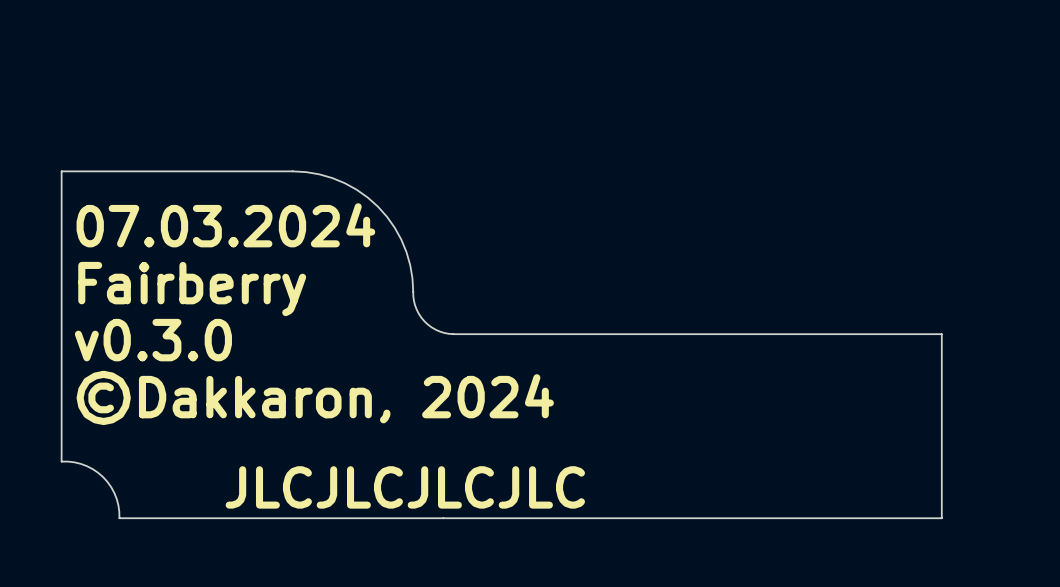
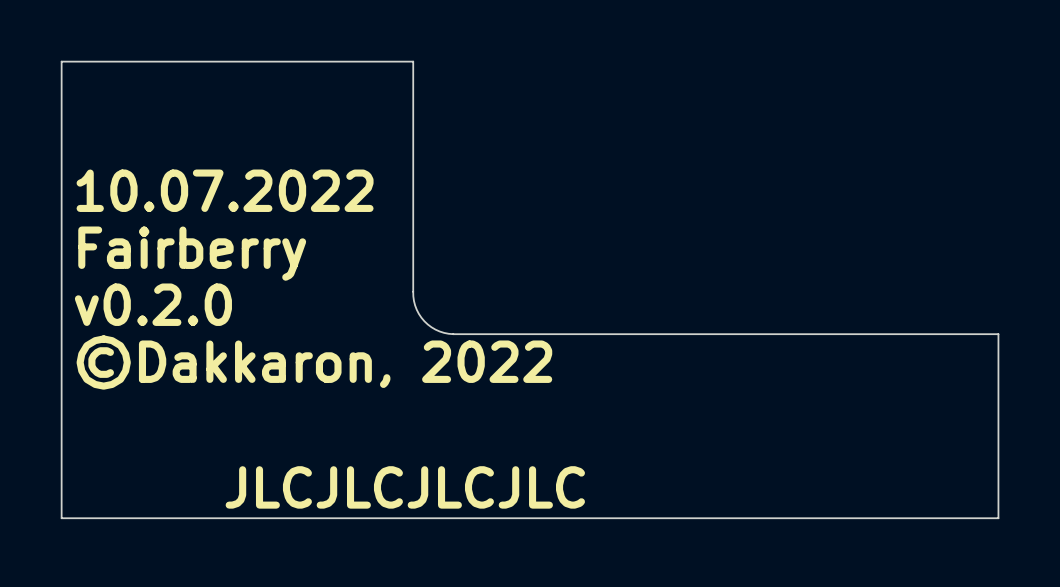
board edge: (61, 171) (292, 171) (319, 174) (332, 178) (356, 189) (367, 197) (377, 206) (394, 227) (406, 251) (412, 278) (413, 291) -> (61, 171) (61, 61) (413, 61) (413, 291)
text: none -> 10.07.2022 (225, 190)
text: 07.03.2024 (225, 225) -> none
text position: Fairberry (192, 289) -> Fairberry (192, 253)
board edge: (941, 334) (941, 518) -> (941, 334) (998, 334) (998, 518) (941, 518)
text: v0.3.0 (153, 340) -> v0.2.0 (153, 304)
text: ©Dakkaron, 2024 (315, 397) -> ©Dakkaron, 2022 (314, 362)
board edge: (61, 461) (74, 462) (87, 466) (103, 477) (114, 492) (118, 505) (119, 518) -> (61, 461) (61, 518) (119, 518)

